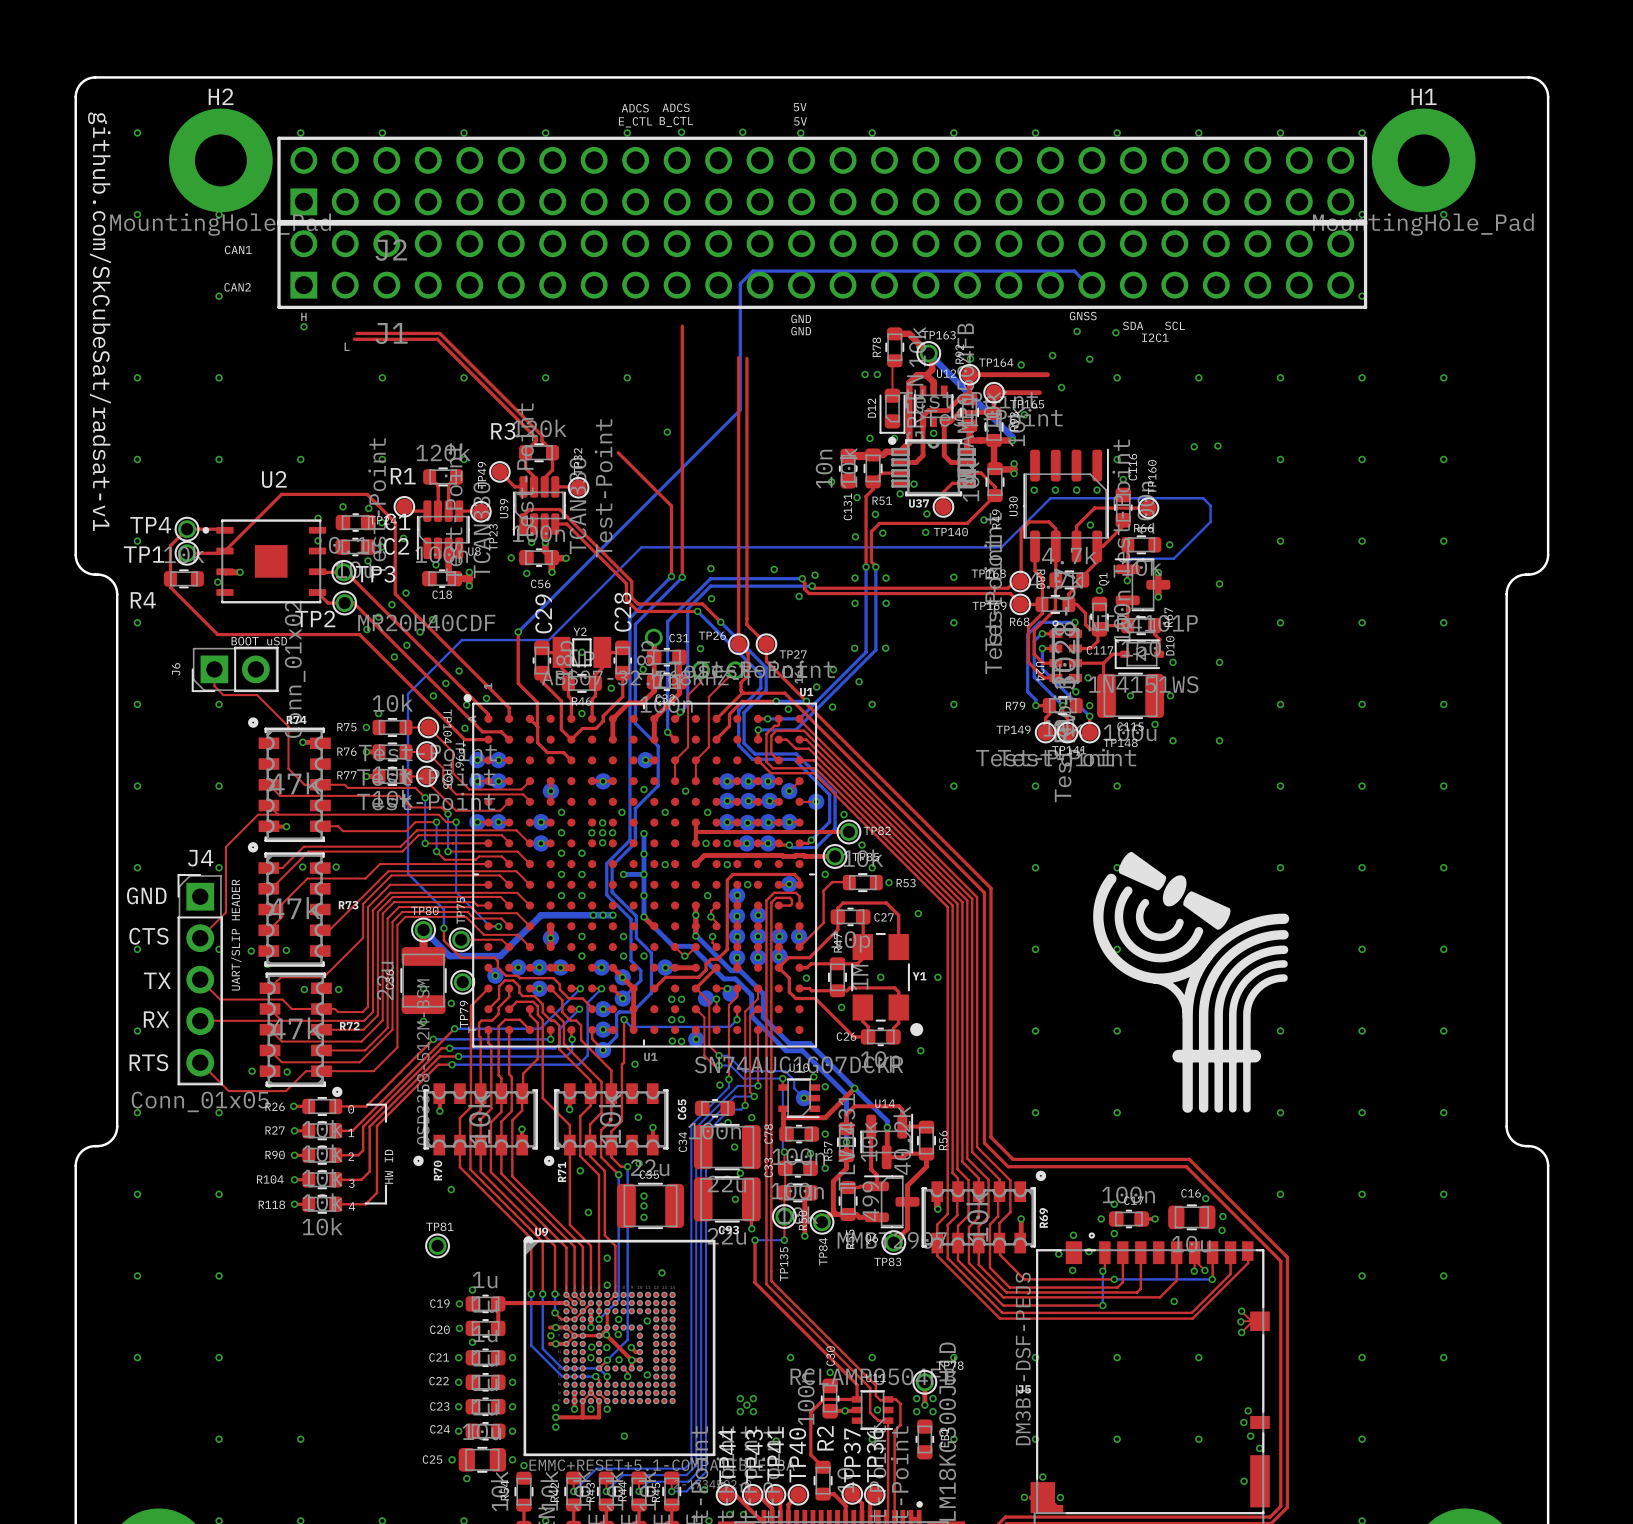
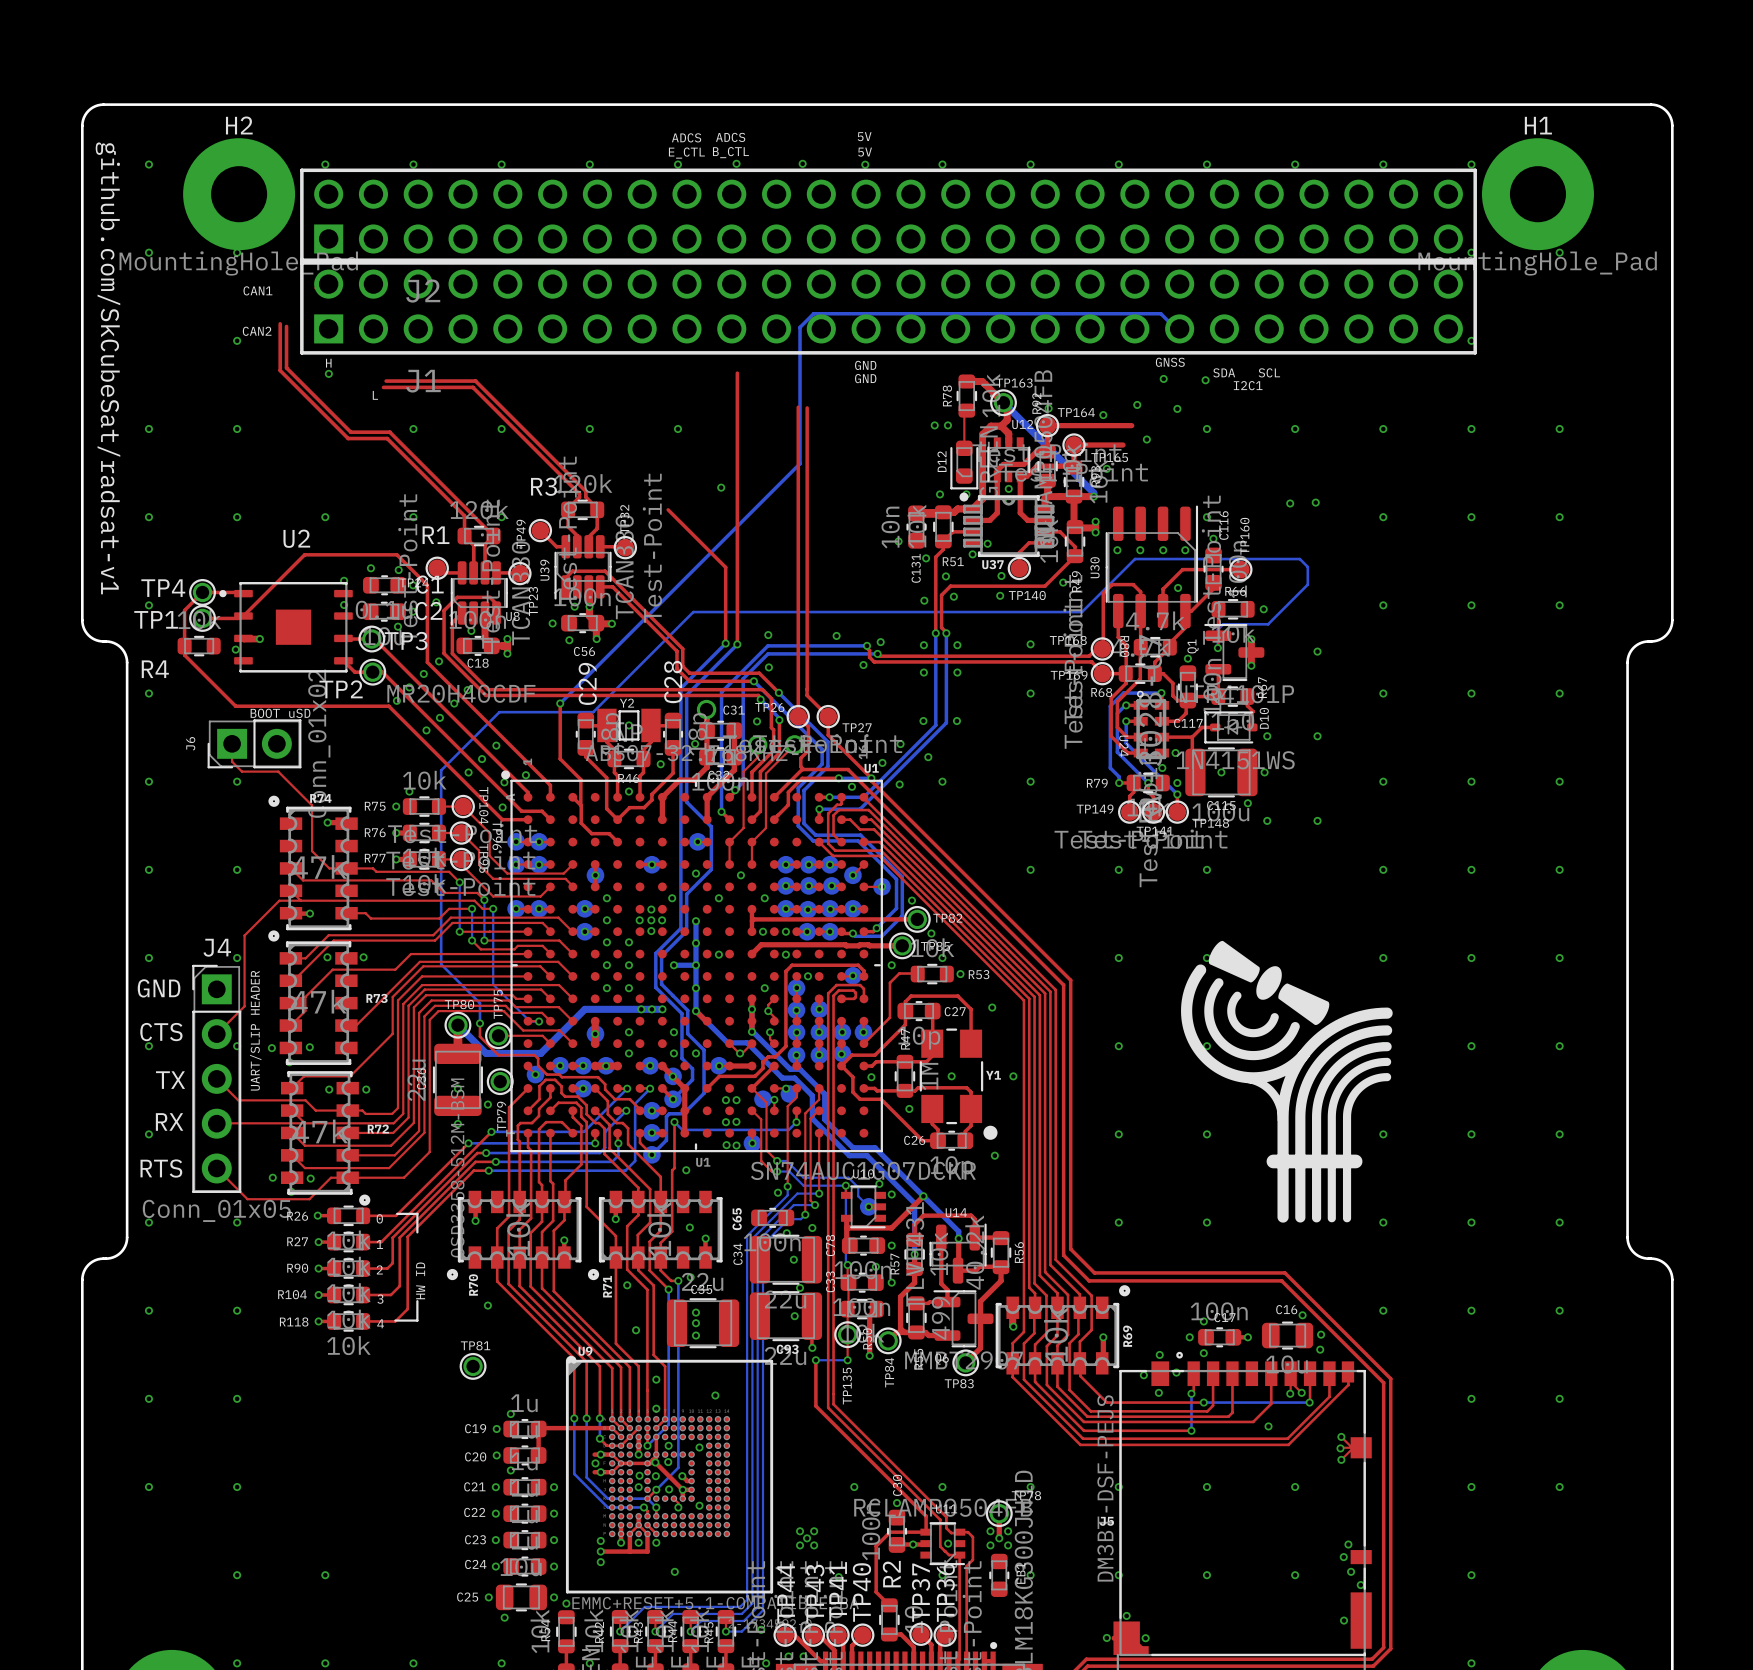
top track: none -> (280, 323) (280, 370) (348, 438) (387, 438) (464, 515) (464, 536)
top track: none -> (286, 326) (286, 367) (350, 432) (389, 432) (493, 536)
top track: none -> (462, 613) (452, 622) (452, 653) (488, 689) (762, 689) (771, 698) (773, 750) (751, 772) (751, 797)
top track: none -> (496, 613) (496, 603) (489, 597) (457, 597) (444, 610) (444, 653) (486, 695) (758, 695) (760, 699)
bottom track: none -> (760, 699) (779, 720)
via: none -> (760, 699)
top track: none -> (779, 720) (779, 752) (760, 771) (760, 811) (751, 819)
via: none -> (779, 720)

